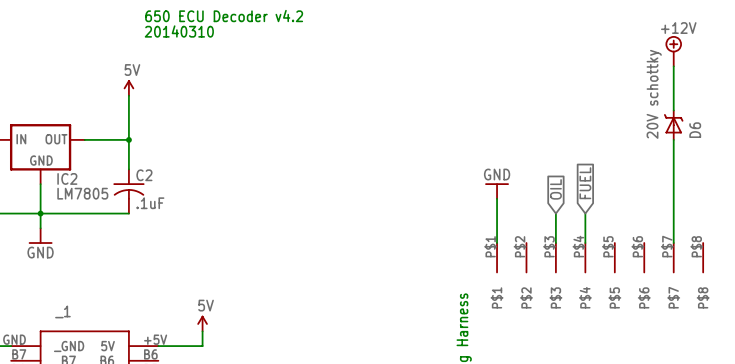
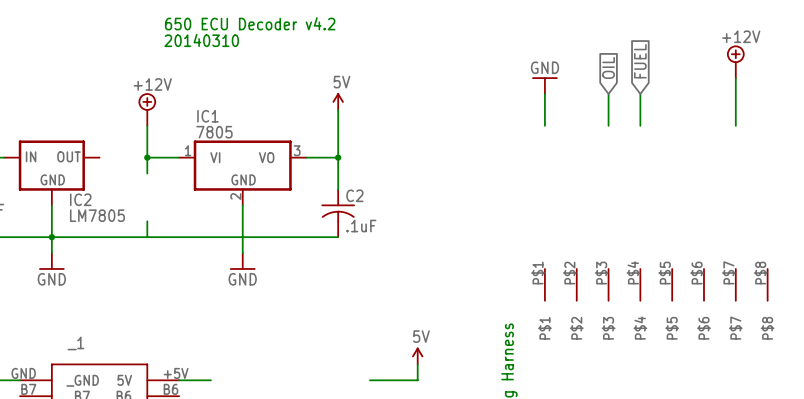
wire: none -> (544, 94) (544, 125)
power symbol: 5V (128, 88) -> none
power symbol: none -> 5V (338, 101)
power symbol: none -> +12V (147, 109)
wire: none -> (338, 109) (338, 189)
D6: 20V schottky (673, 125) -> none
wire: (84, 139) (128, 139) -> (179, 157) (147, 157)
wire: none -> (306, 157) (338, 157)
junction: none -> (338, 157)
wire: (673, 139) (673, 243) -> none
wire: (128, 154) (128, 169) -> none
IC1: none -> 7805 (242, 172)
global label position: FUEL (585, 183) -> FUEL (640, 61)
wire: none -> (242, 205) (242, 253)
global label position: OIL (555, 189) -> OIL (608, 67)
C2 position: (128, 191) -> (338, 213)
power symbol position: GND (497, 191) -> GND (544, 85)
wire: none -> (147, 221) (147, 237) (338, 237)
wire: (497, 198) (497, 243) -> none
wire: (555, 213) (555, 243) -> (608, 94) (608, 125)
wire: (585, 213) (585, 243) -> (640, 94) (640, 125)
power symbol: none -> GND (242, 261)
power symbol: 5V (202, 323) -> none
power symbol: none -> 5V (417, 356)
wire: (202, 331) (202, 346) (187, 346) -> none
wire: none -> (417, 364) (417, 380) (369, 380)

